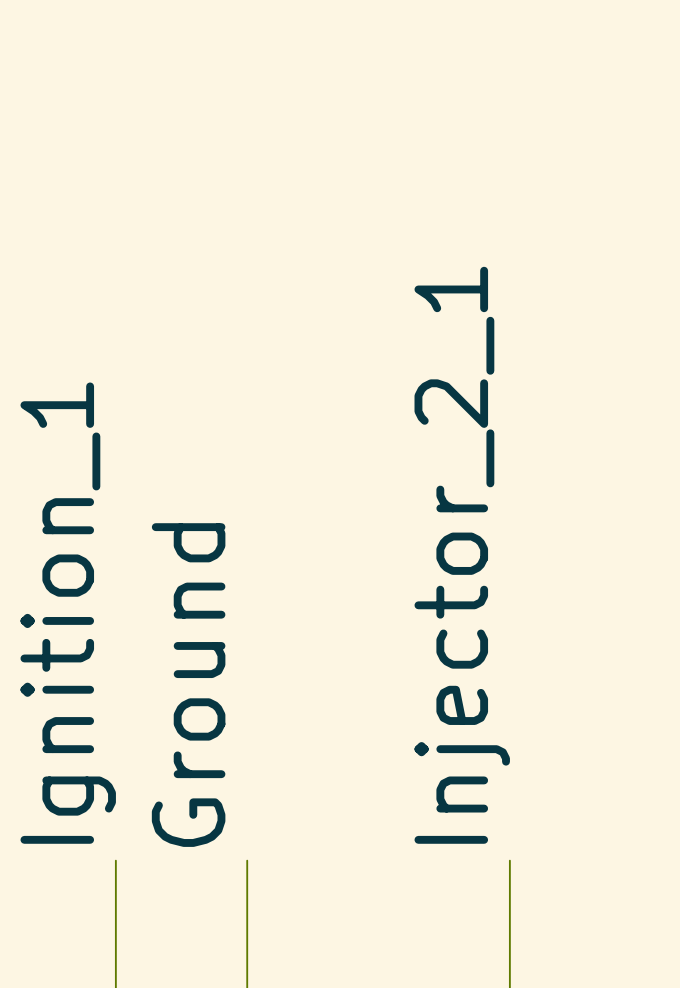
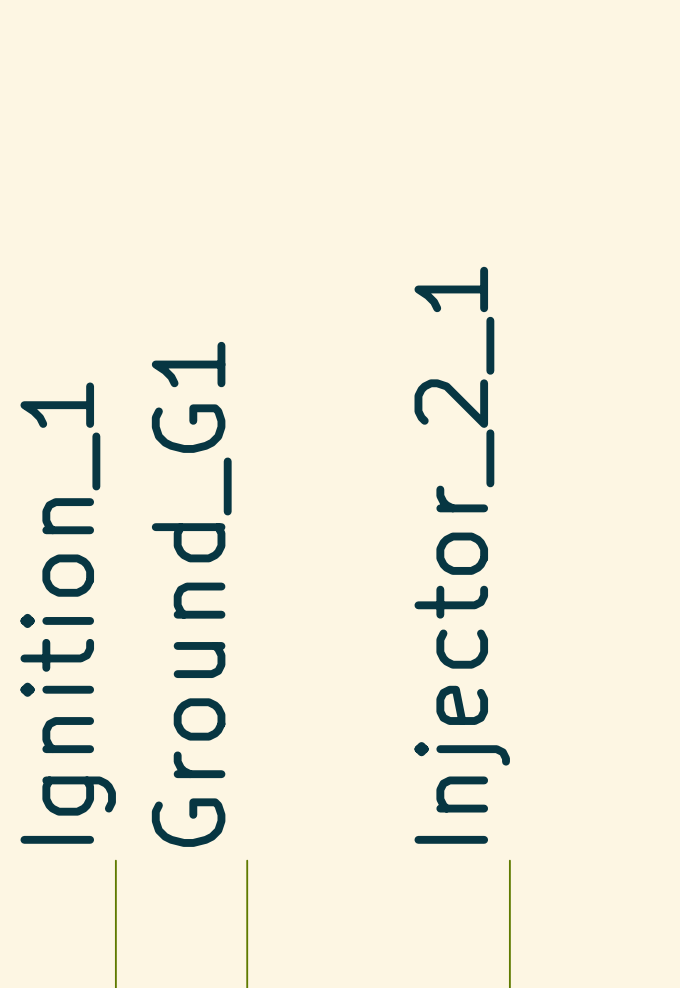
label: Ground (188, 685) -> Ground_G1 (191, 594)

